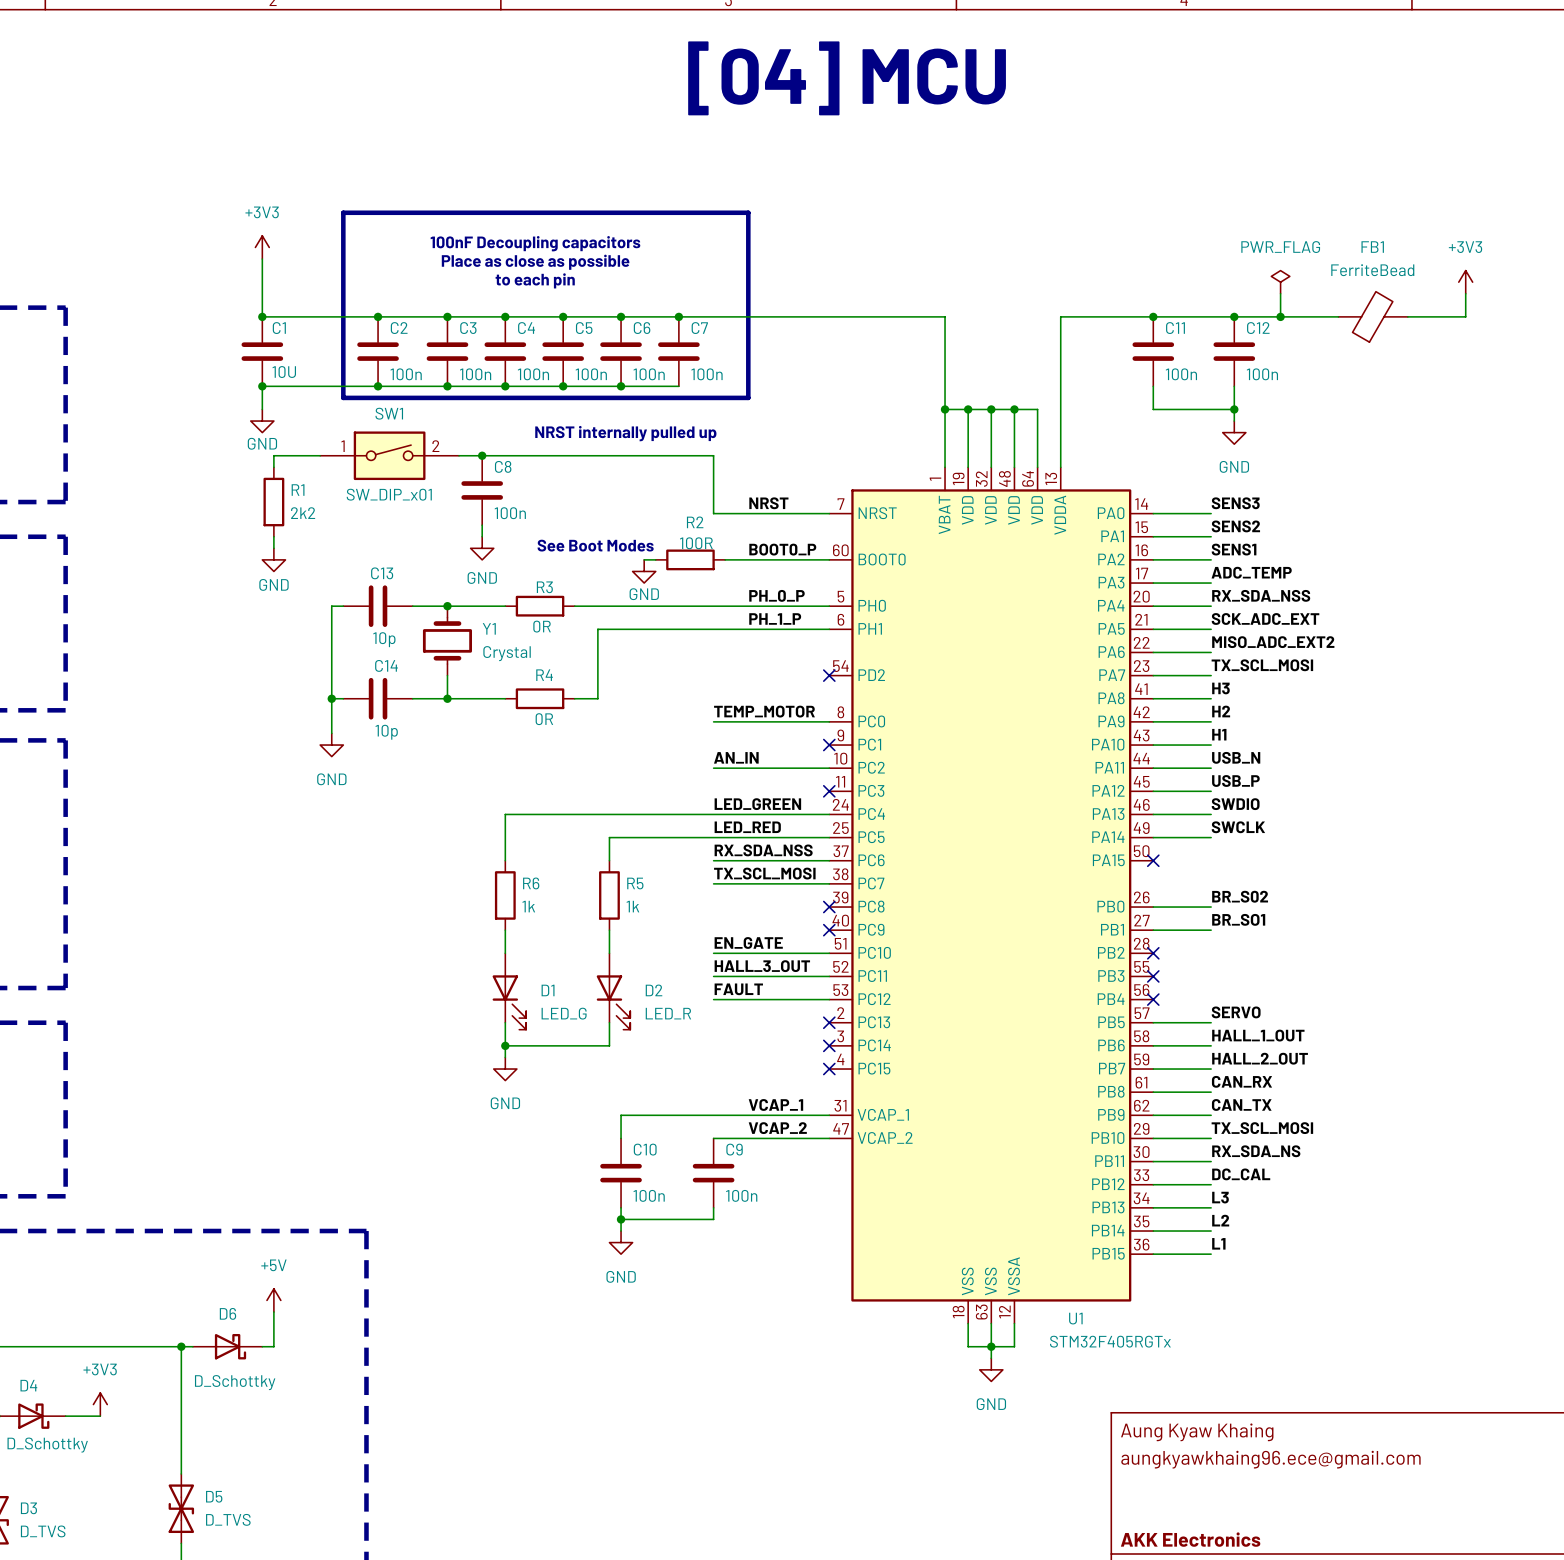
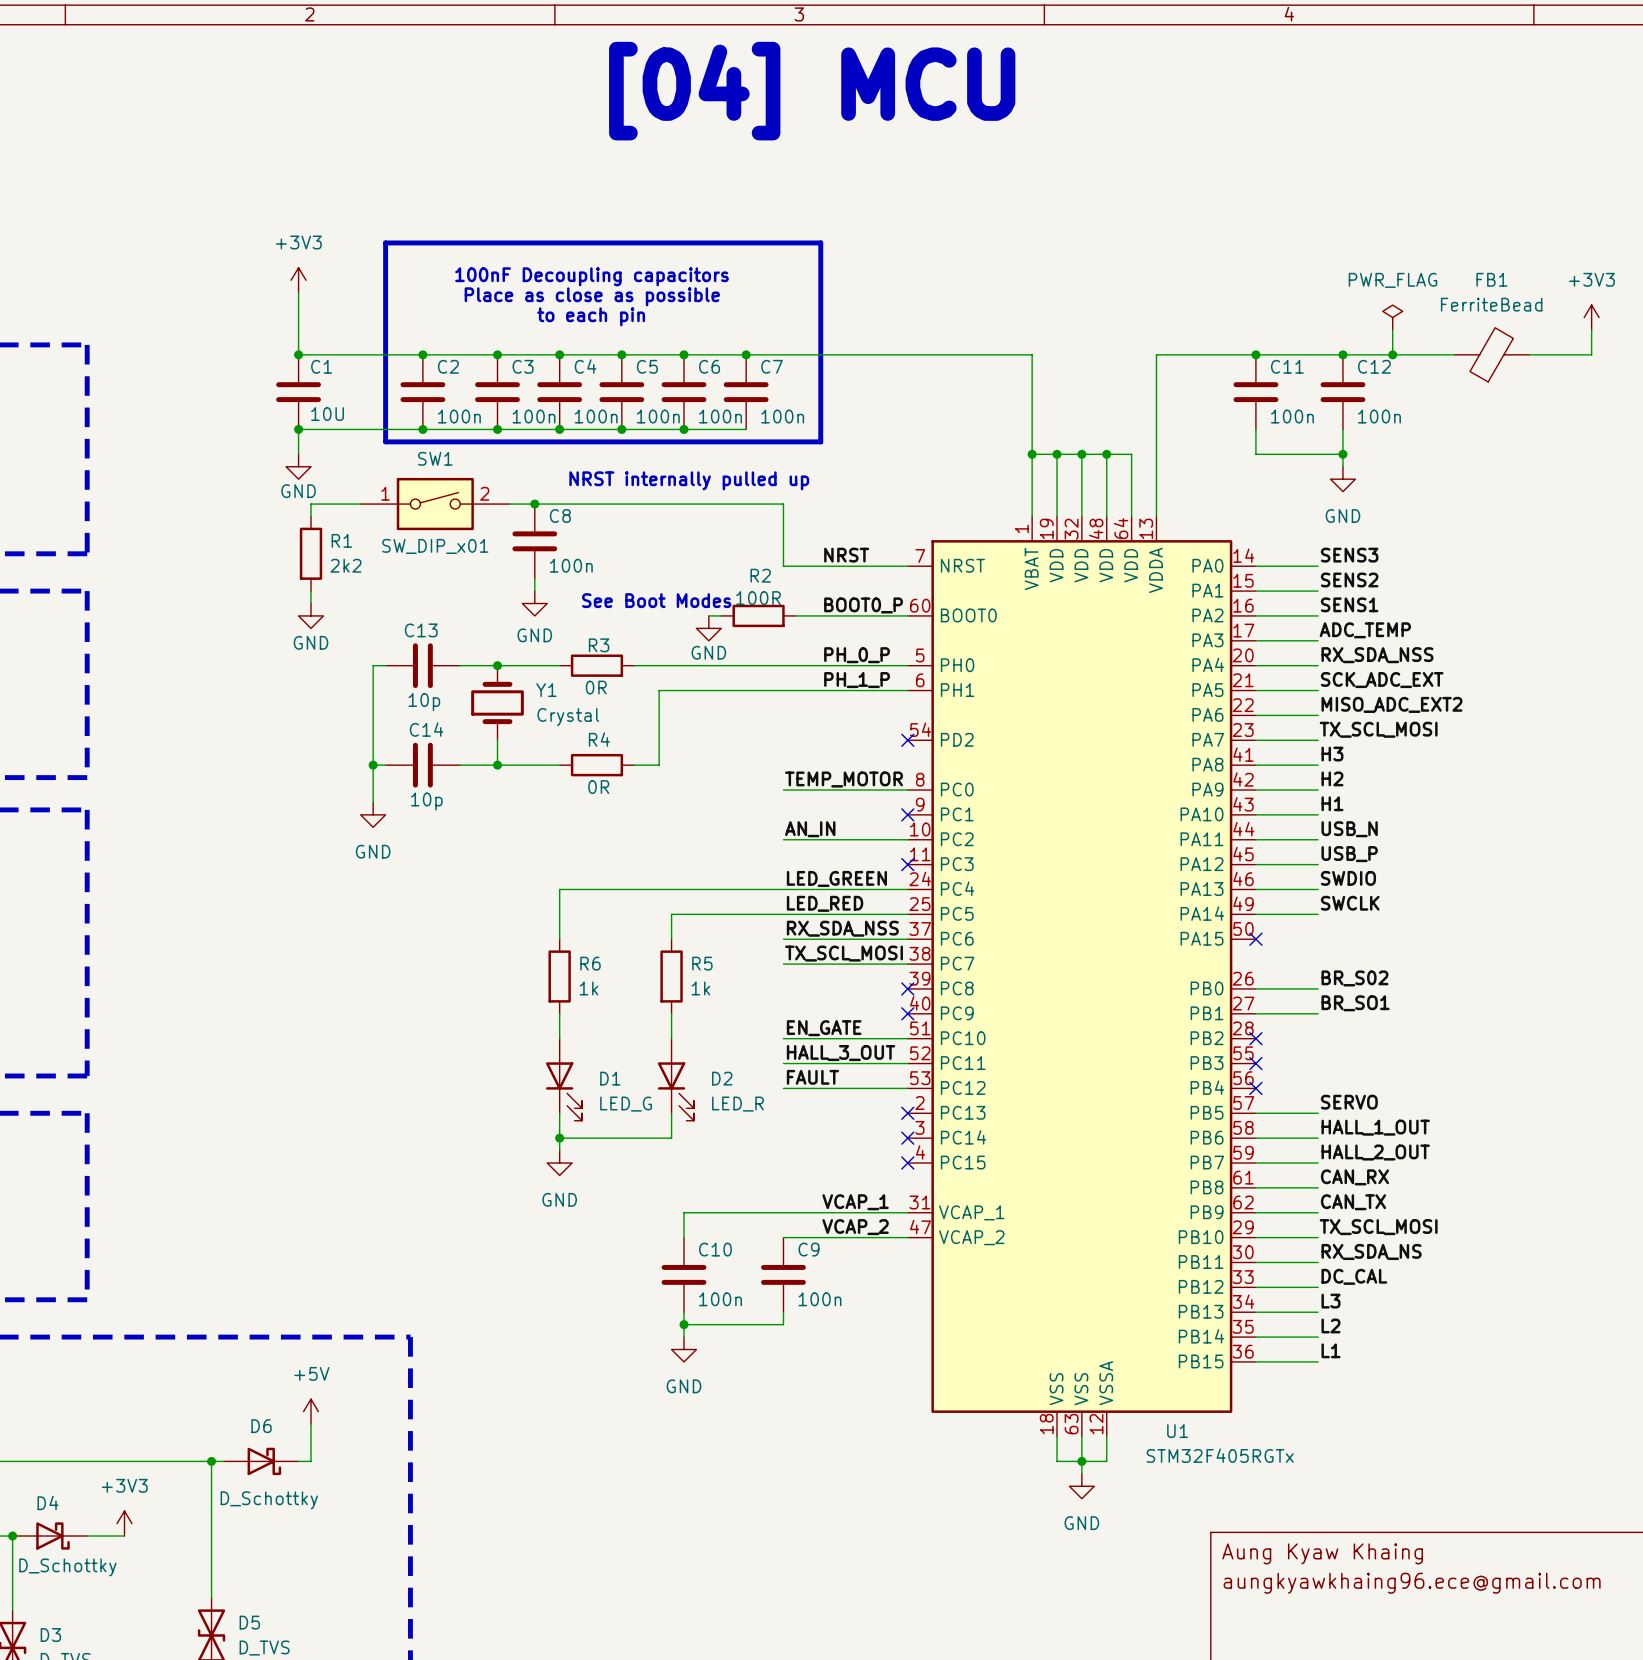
text position: [04] MCU (847, 78) -> [04] MCU (812, 91)

